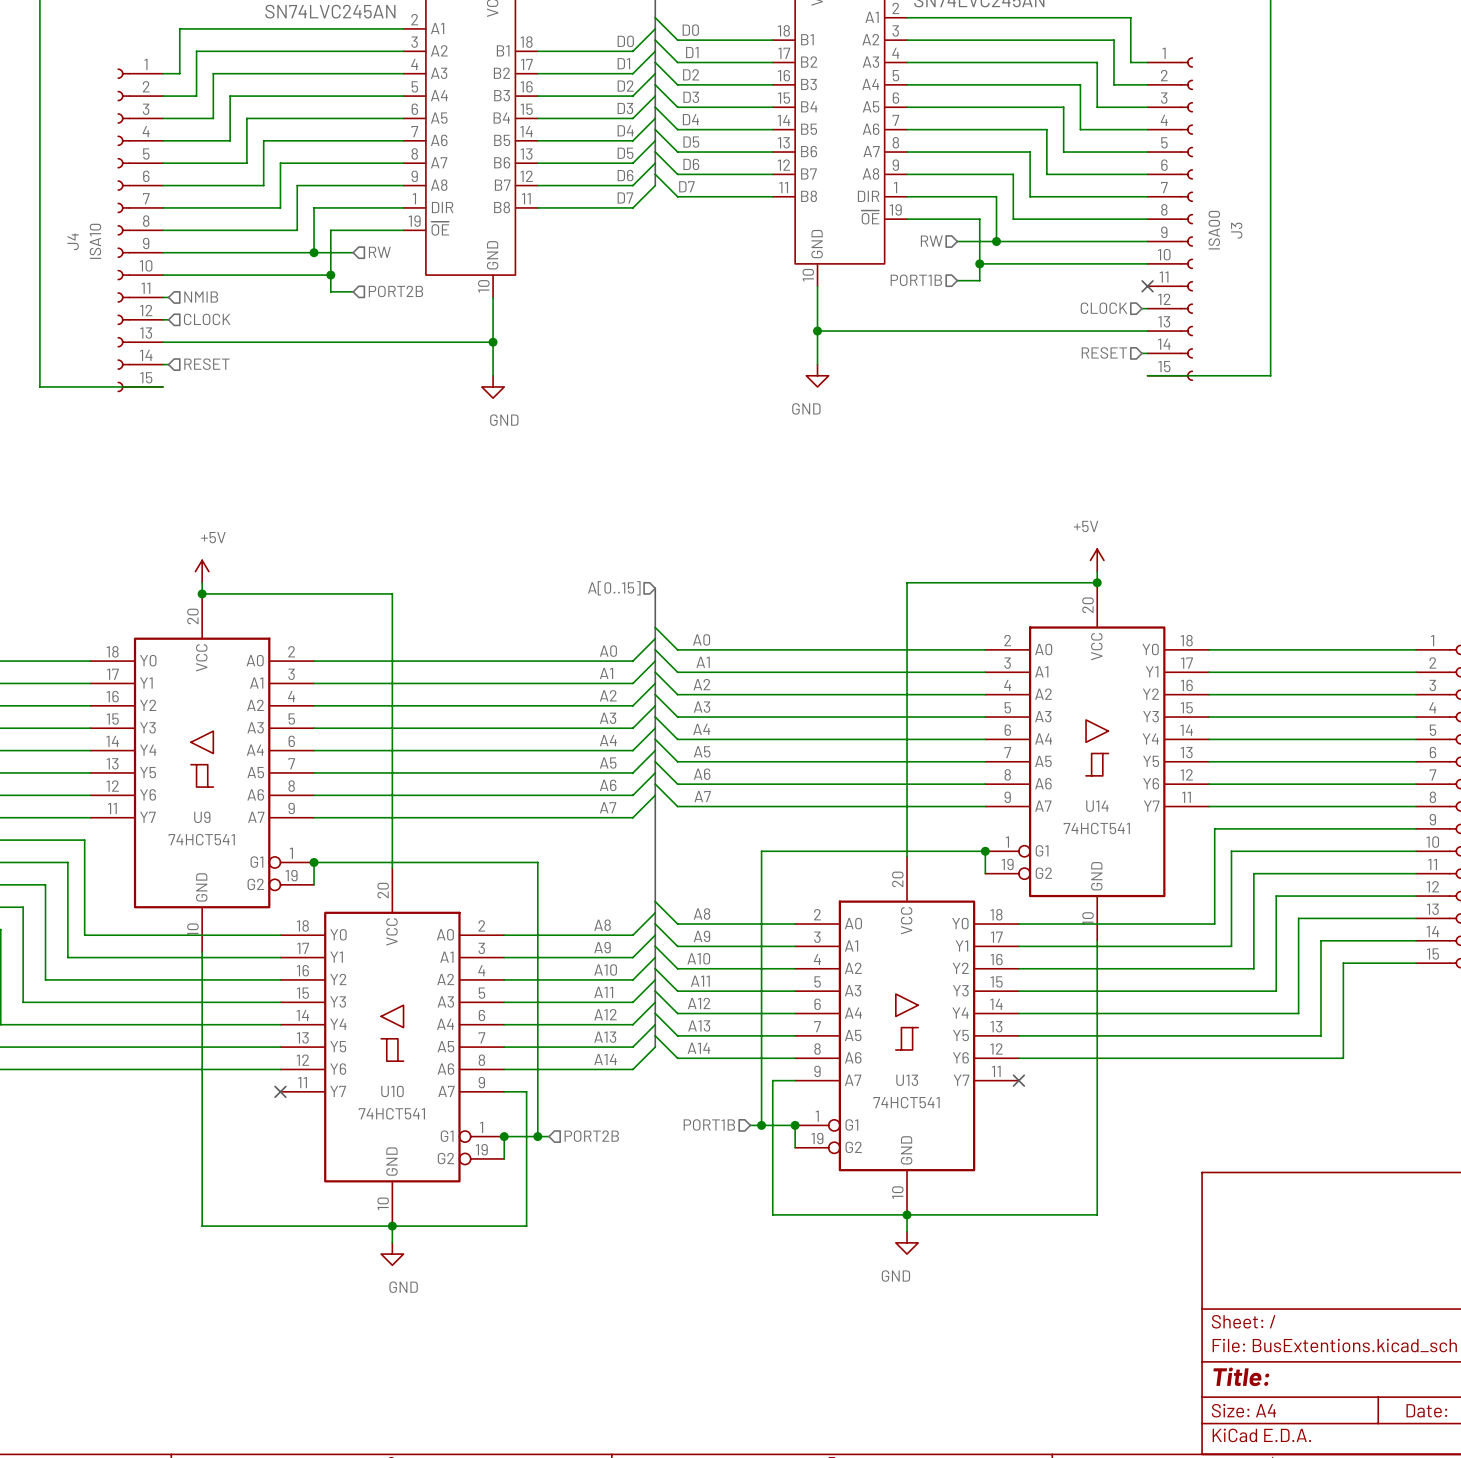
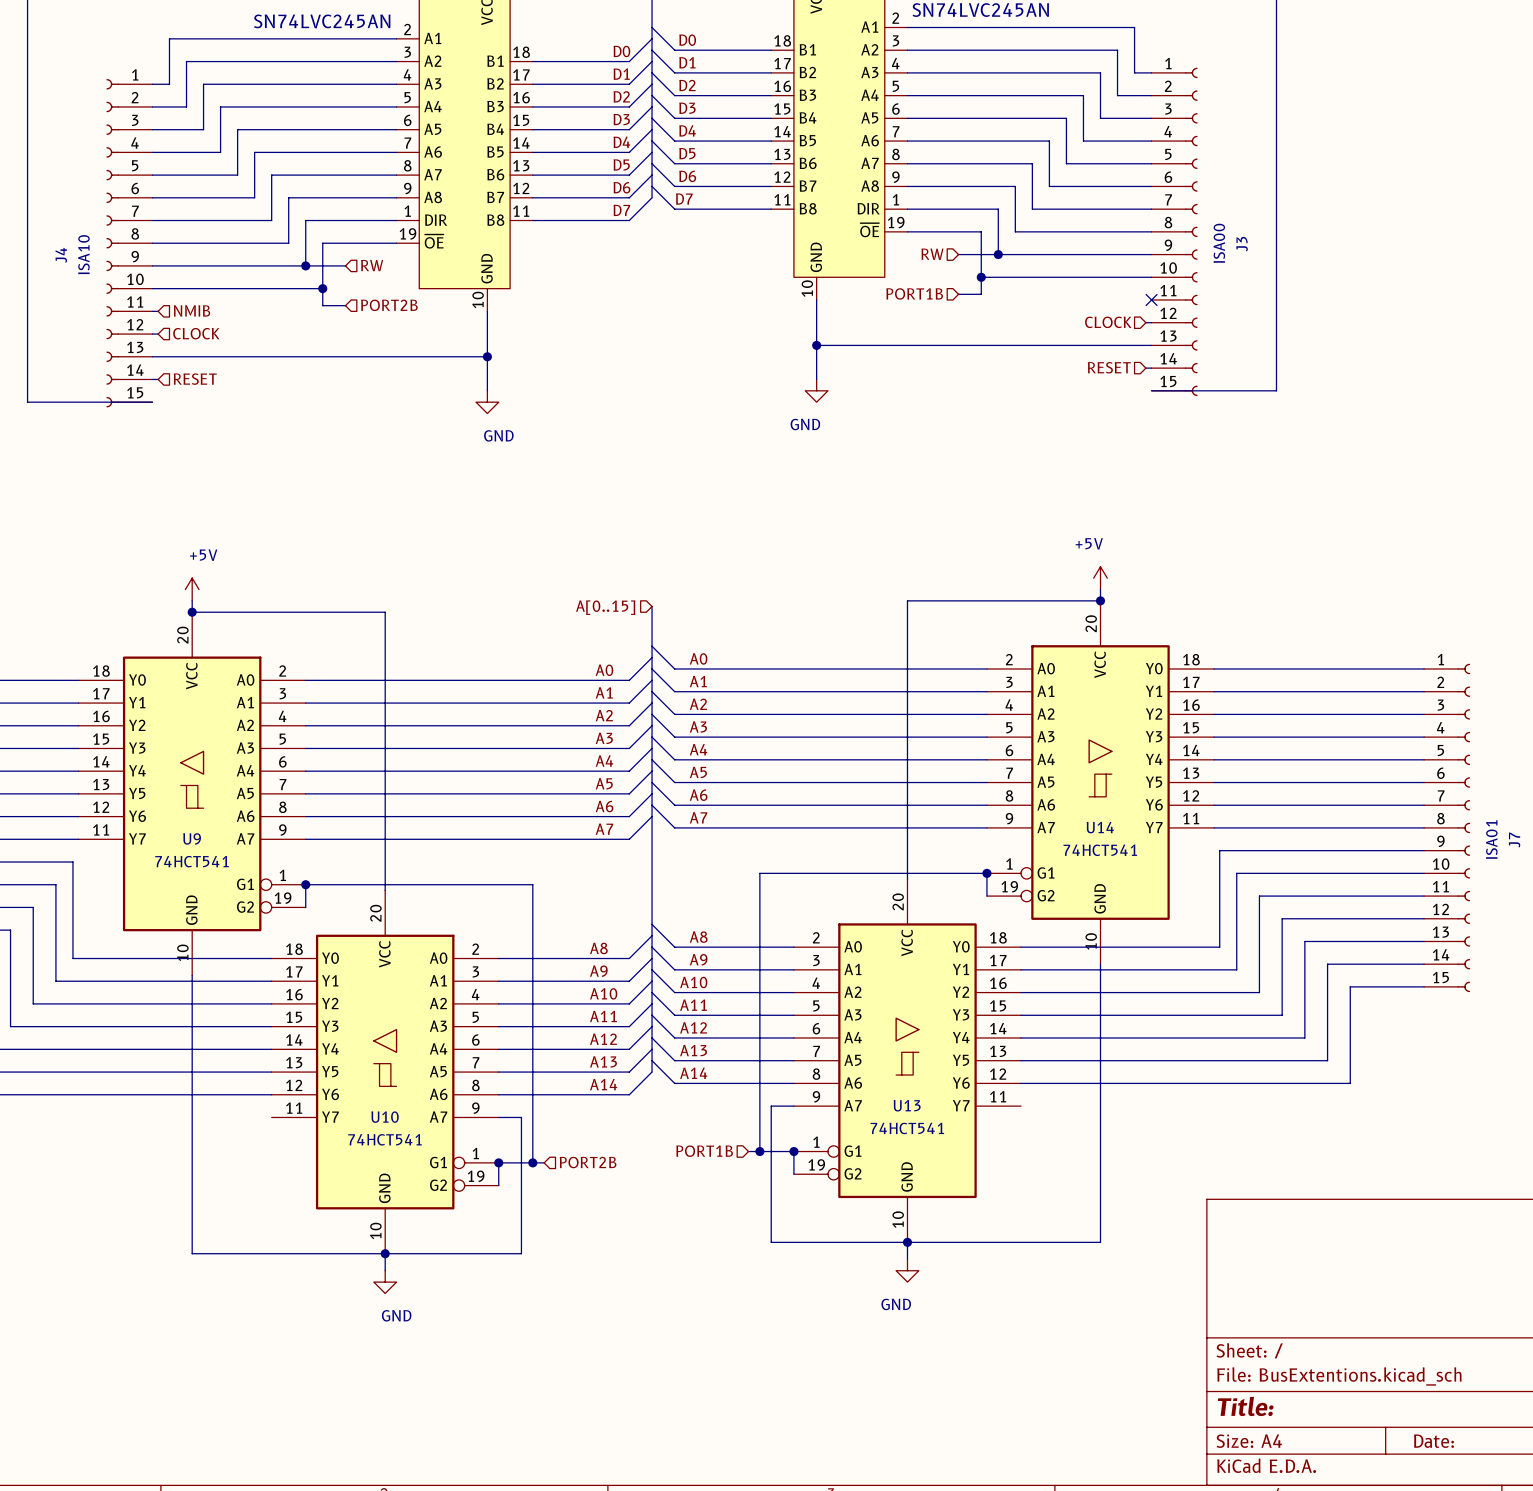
no-connect mark: (1018, 1080) -> none
no-connect mark: (280, 1091) -> none

